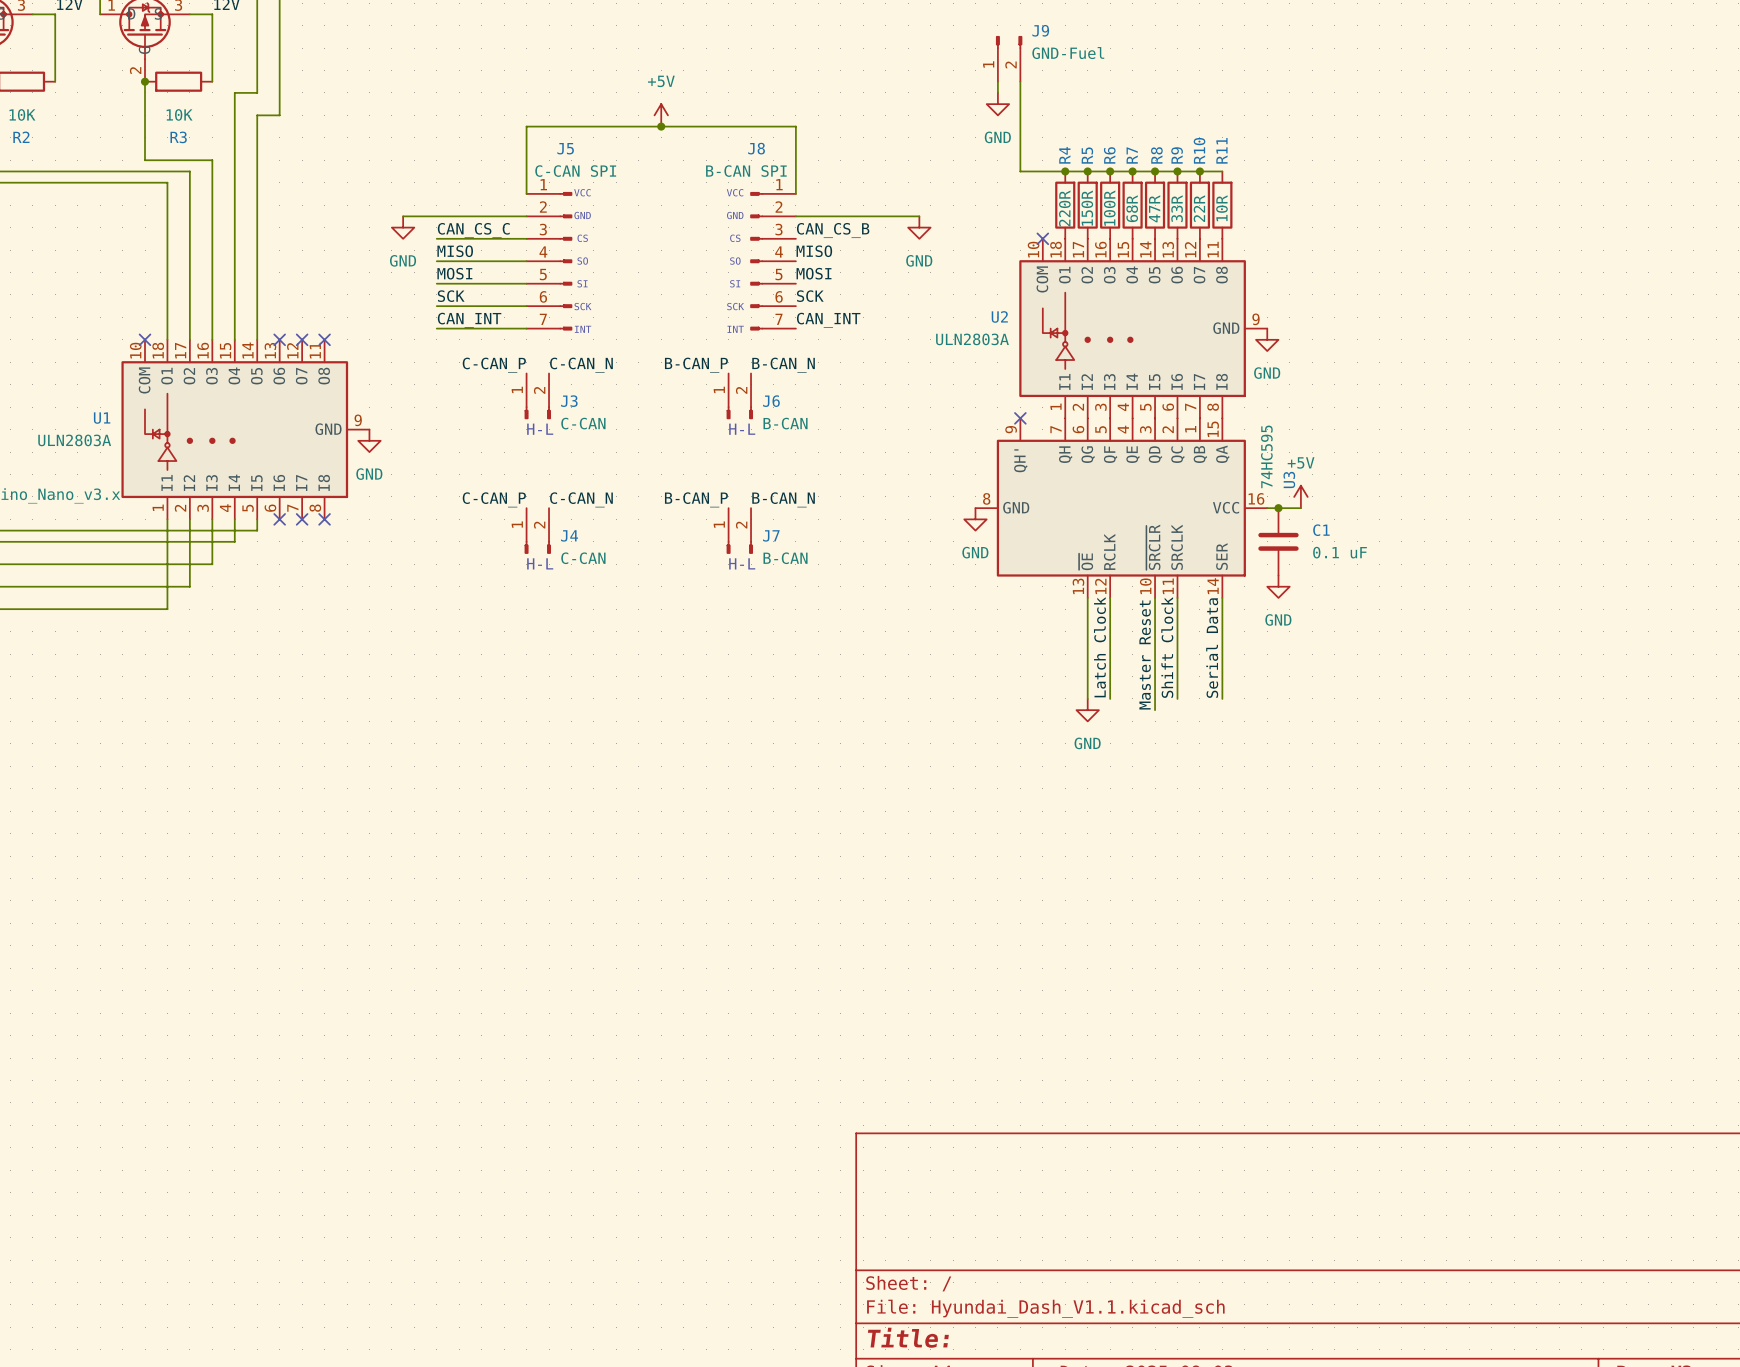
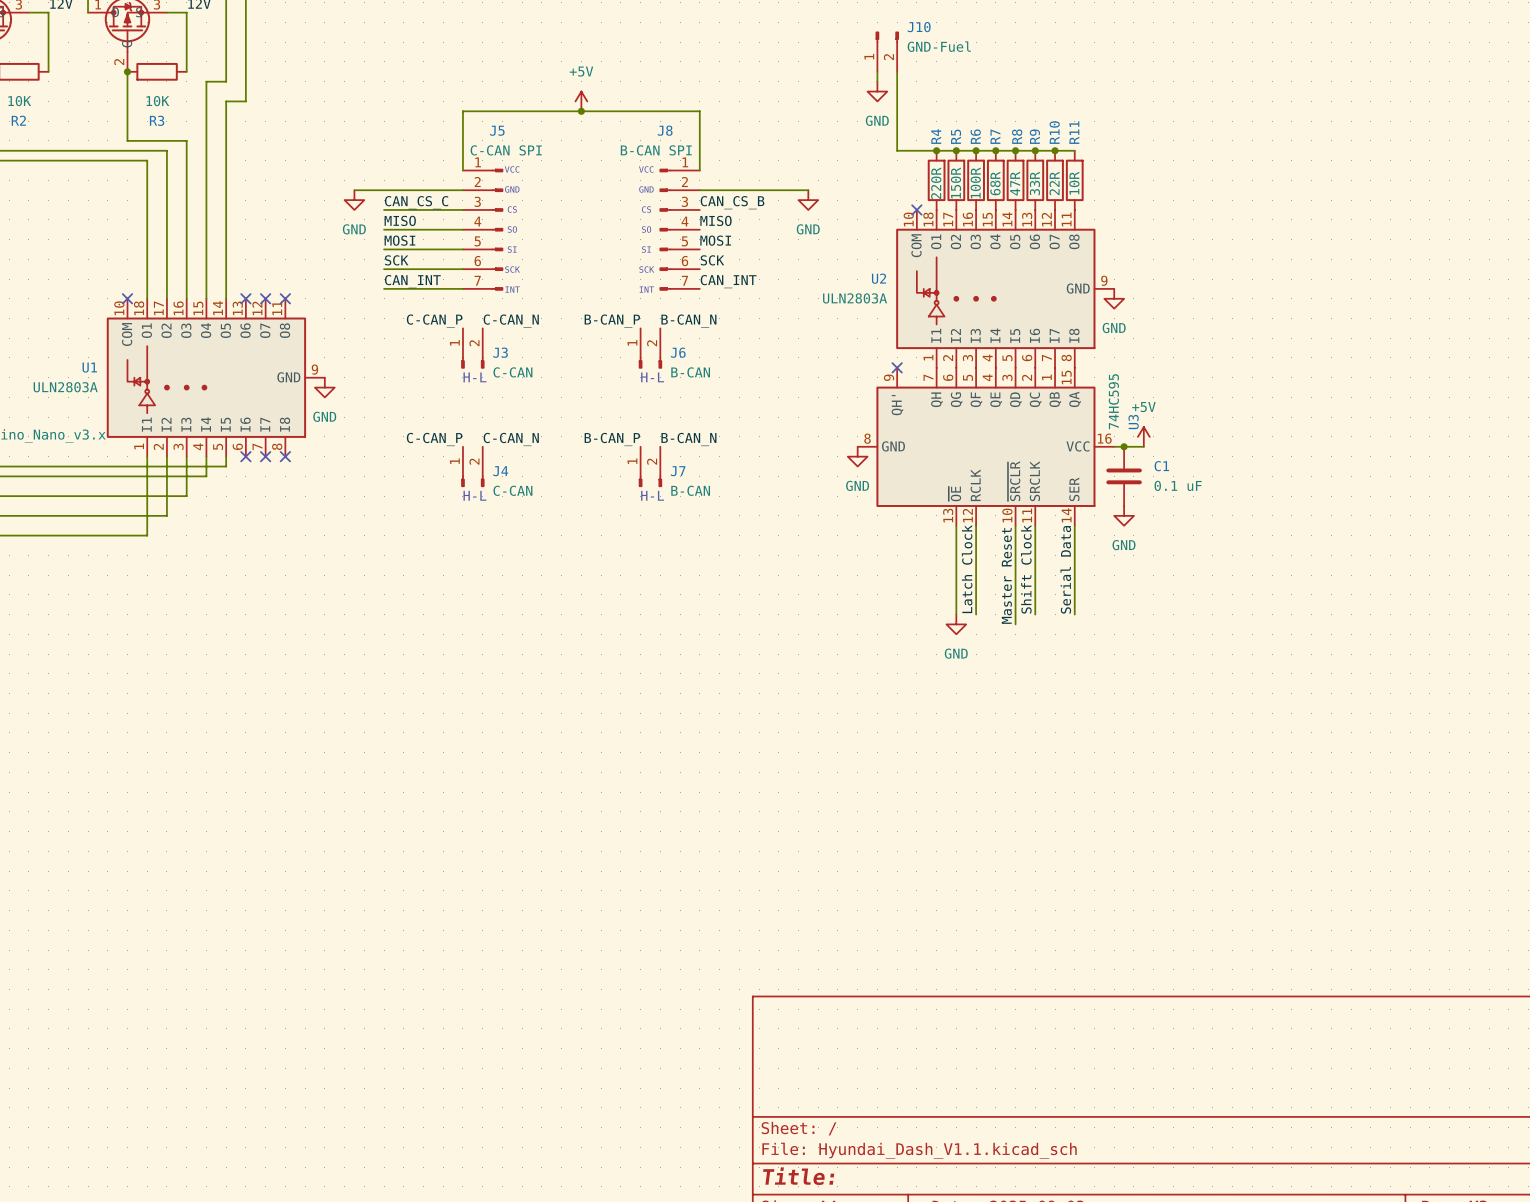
J9 name: J9 (1040, 30) -> J10 (919, 27)

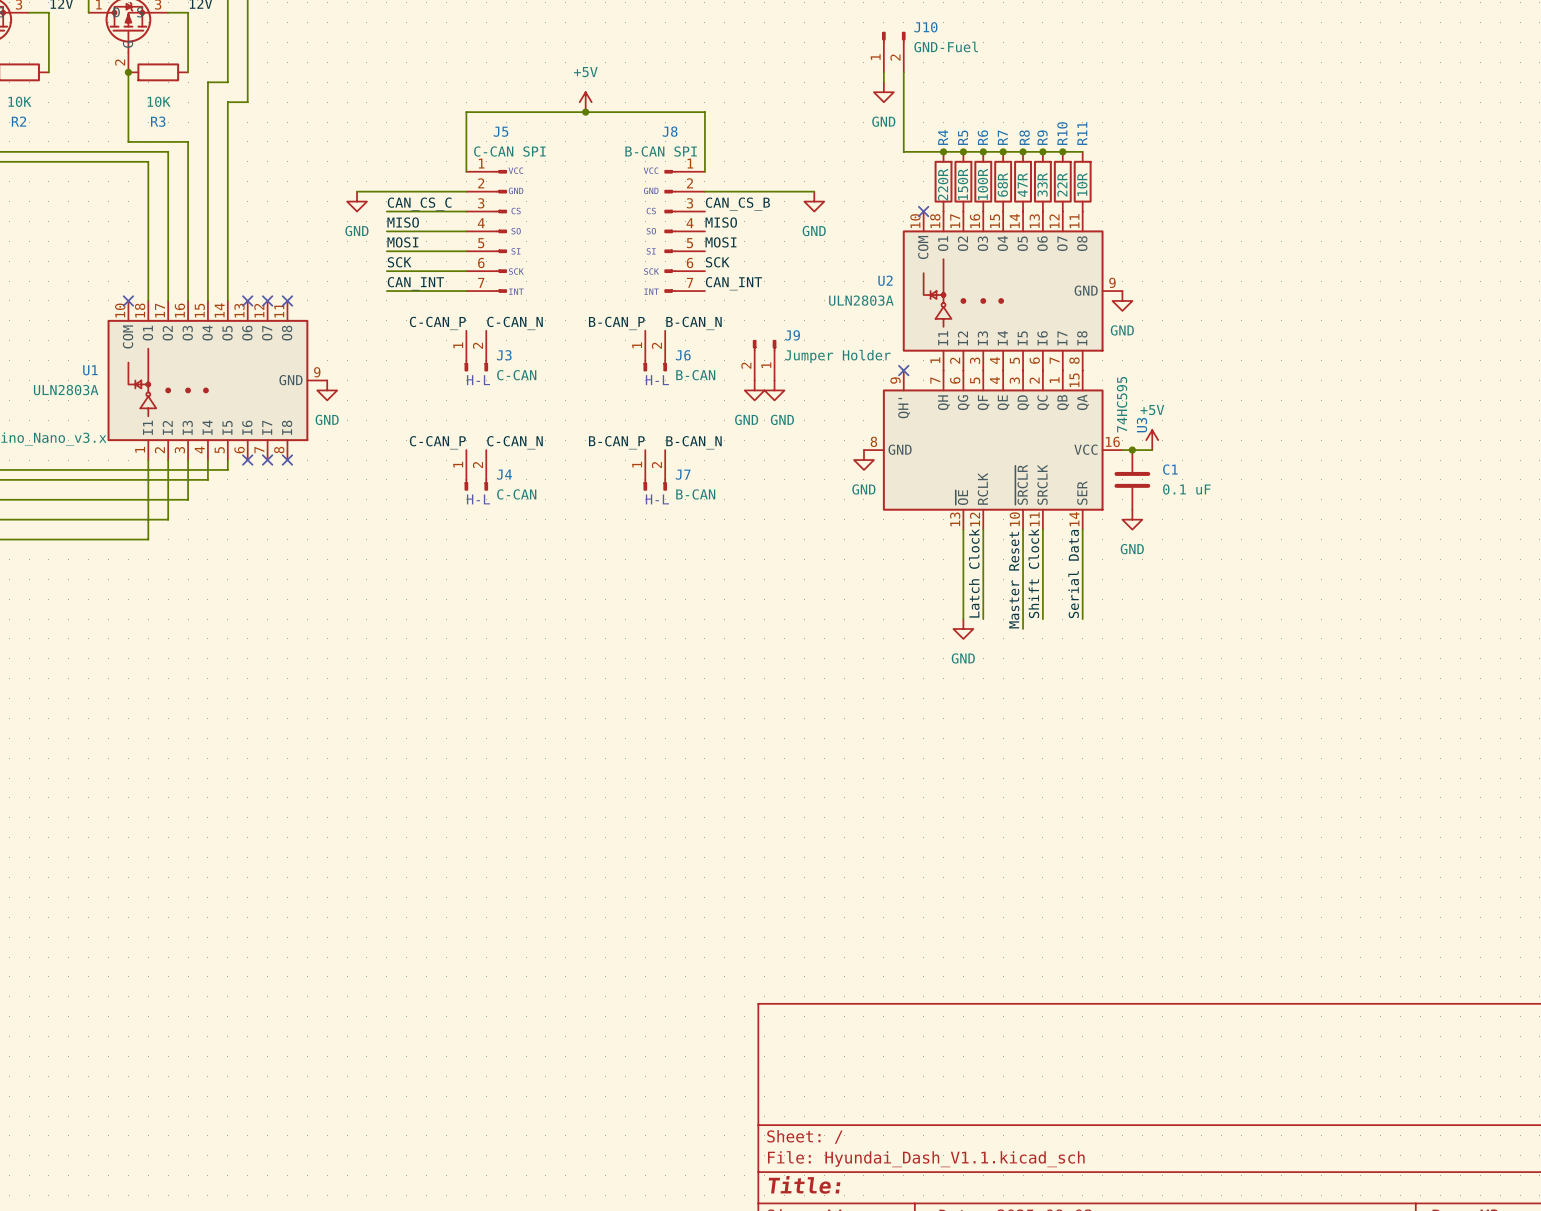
J9: none -> Jumper Holder (764, 360)
power symbol: none -> GND (754, 390)
power symbol: none -> GND (774, 390)

